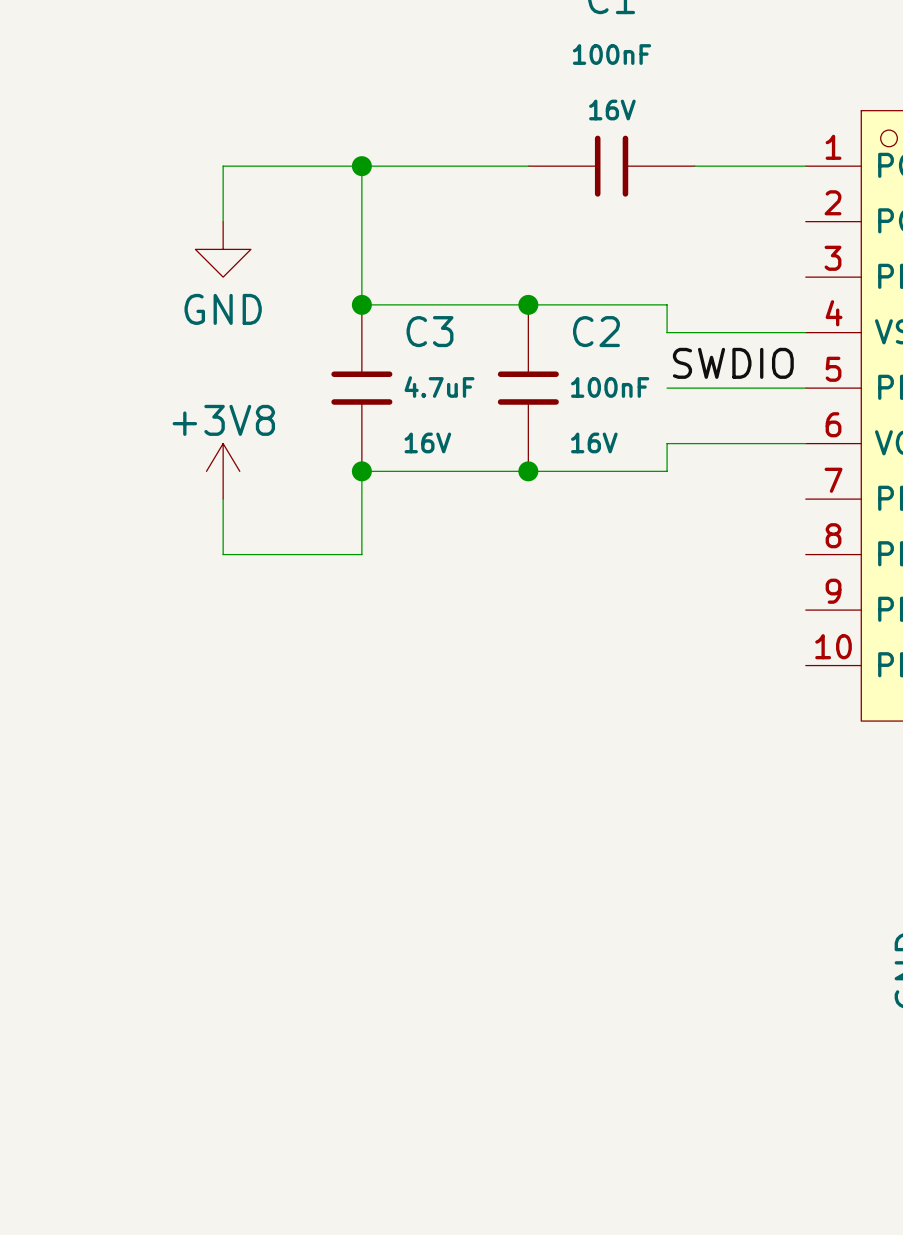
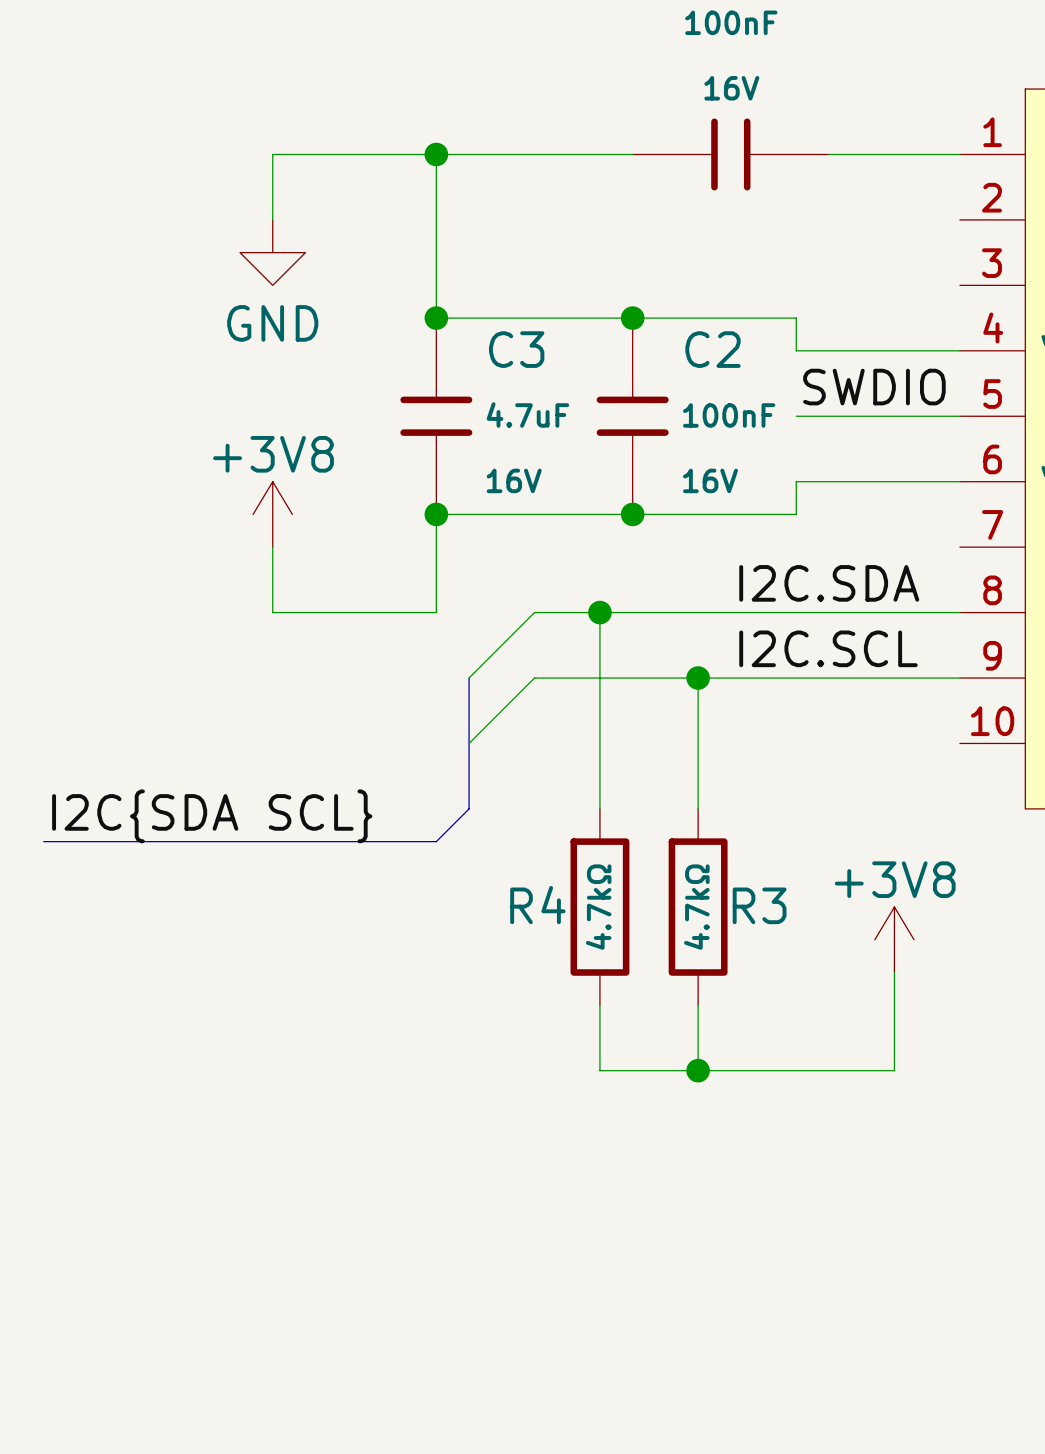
label: none -> I2C.SDA (829, 583)
wire: none -> (599, 612) (599, 808)
junction: none -> (599, 612)
wire: none -> (959, 612) (534, 612) (469, 678)
label: none -> I2C.SCL (828, 648)
bus: none -> (469, 678) (469, 808) (436, 841) (43, 841)
wire: none -> (698, 678) (698, 808)
junction: none -> (698, 678)
wire: none -> (959, 678) (534, 678) (469, 743)
label: none -> I2C{SDA SCL} (212, 816)
R4: none -> 4.7kΩ (599, 907)
R3: none -> 4.7kΩ (698, 907)
power symbol: none -> +3V8 (894, 939)
wire: none -> (894, 972) (894, 1070) (599, 1070) (599, 1005)
wire: none -> (698, 1005) (698, 1070)
junction: none -> (698, 1070)

